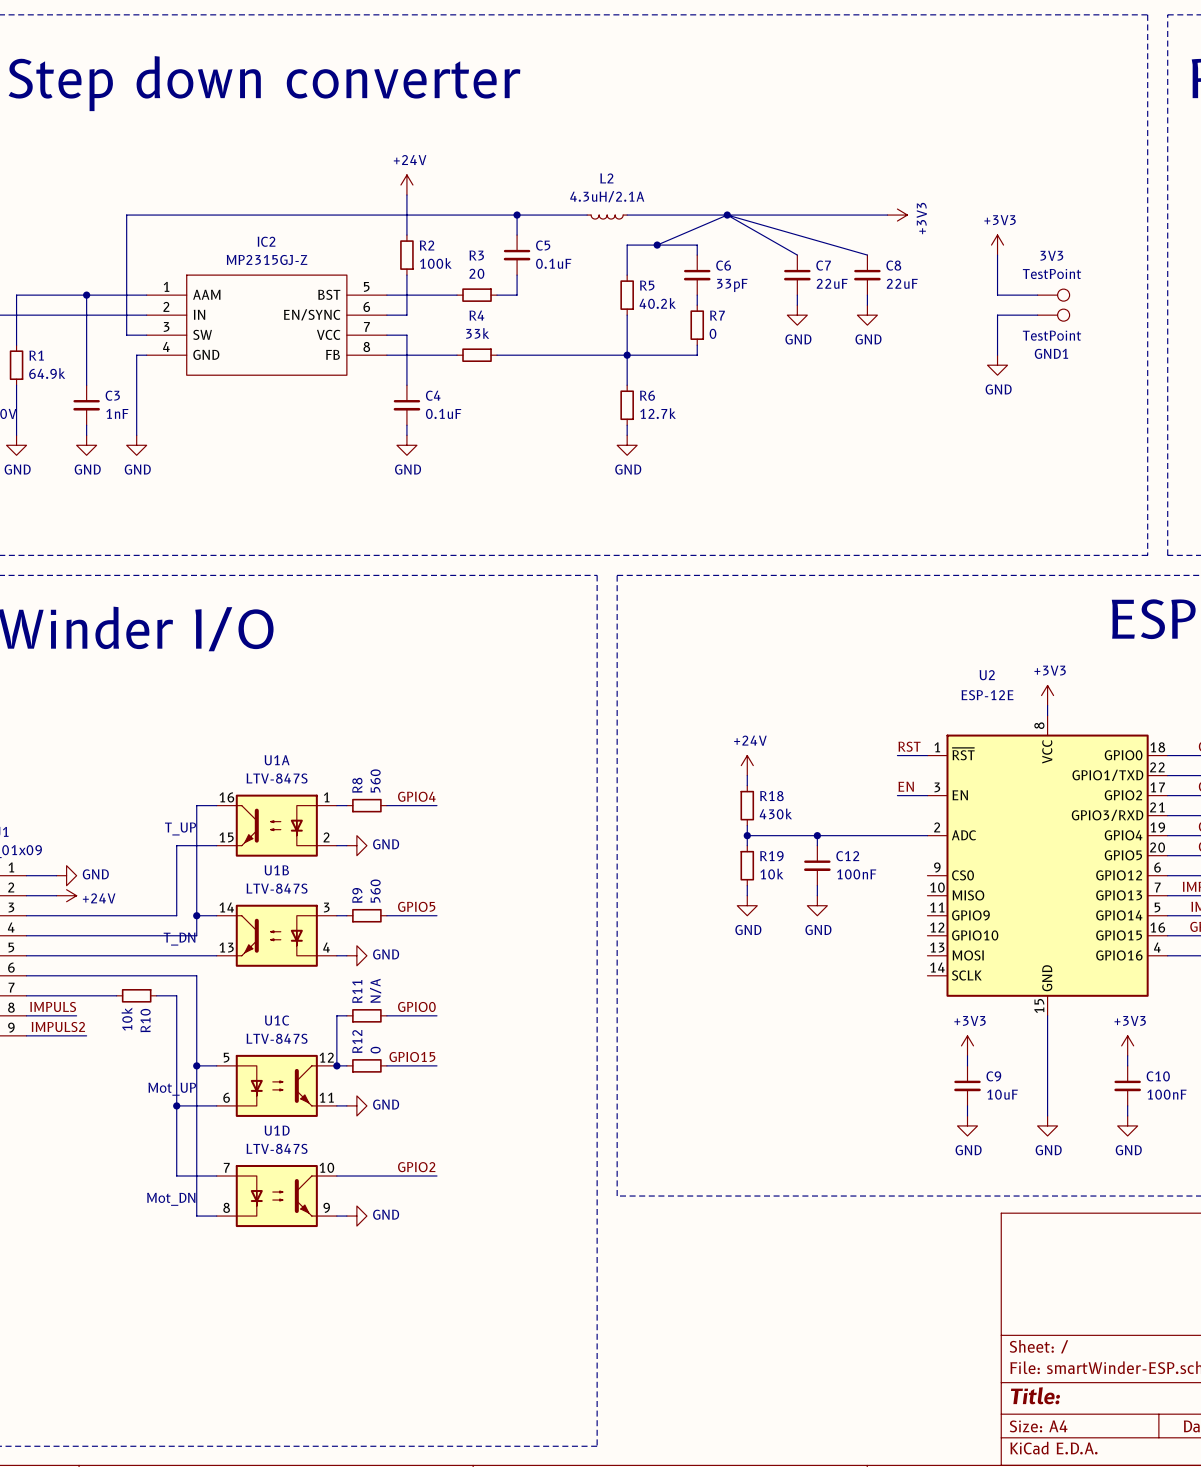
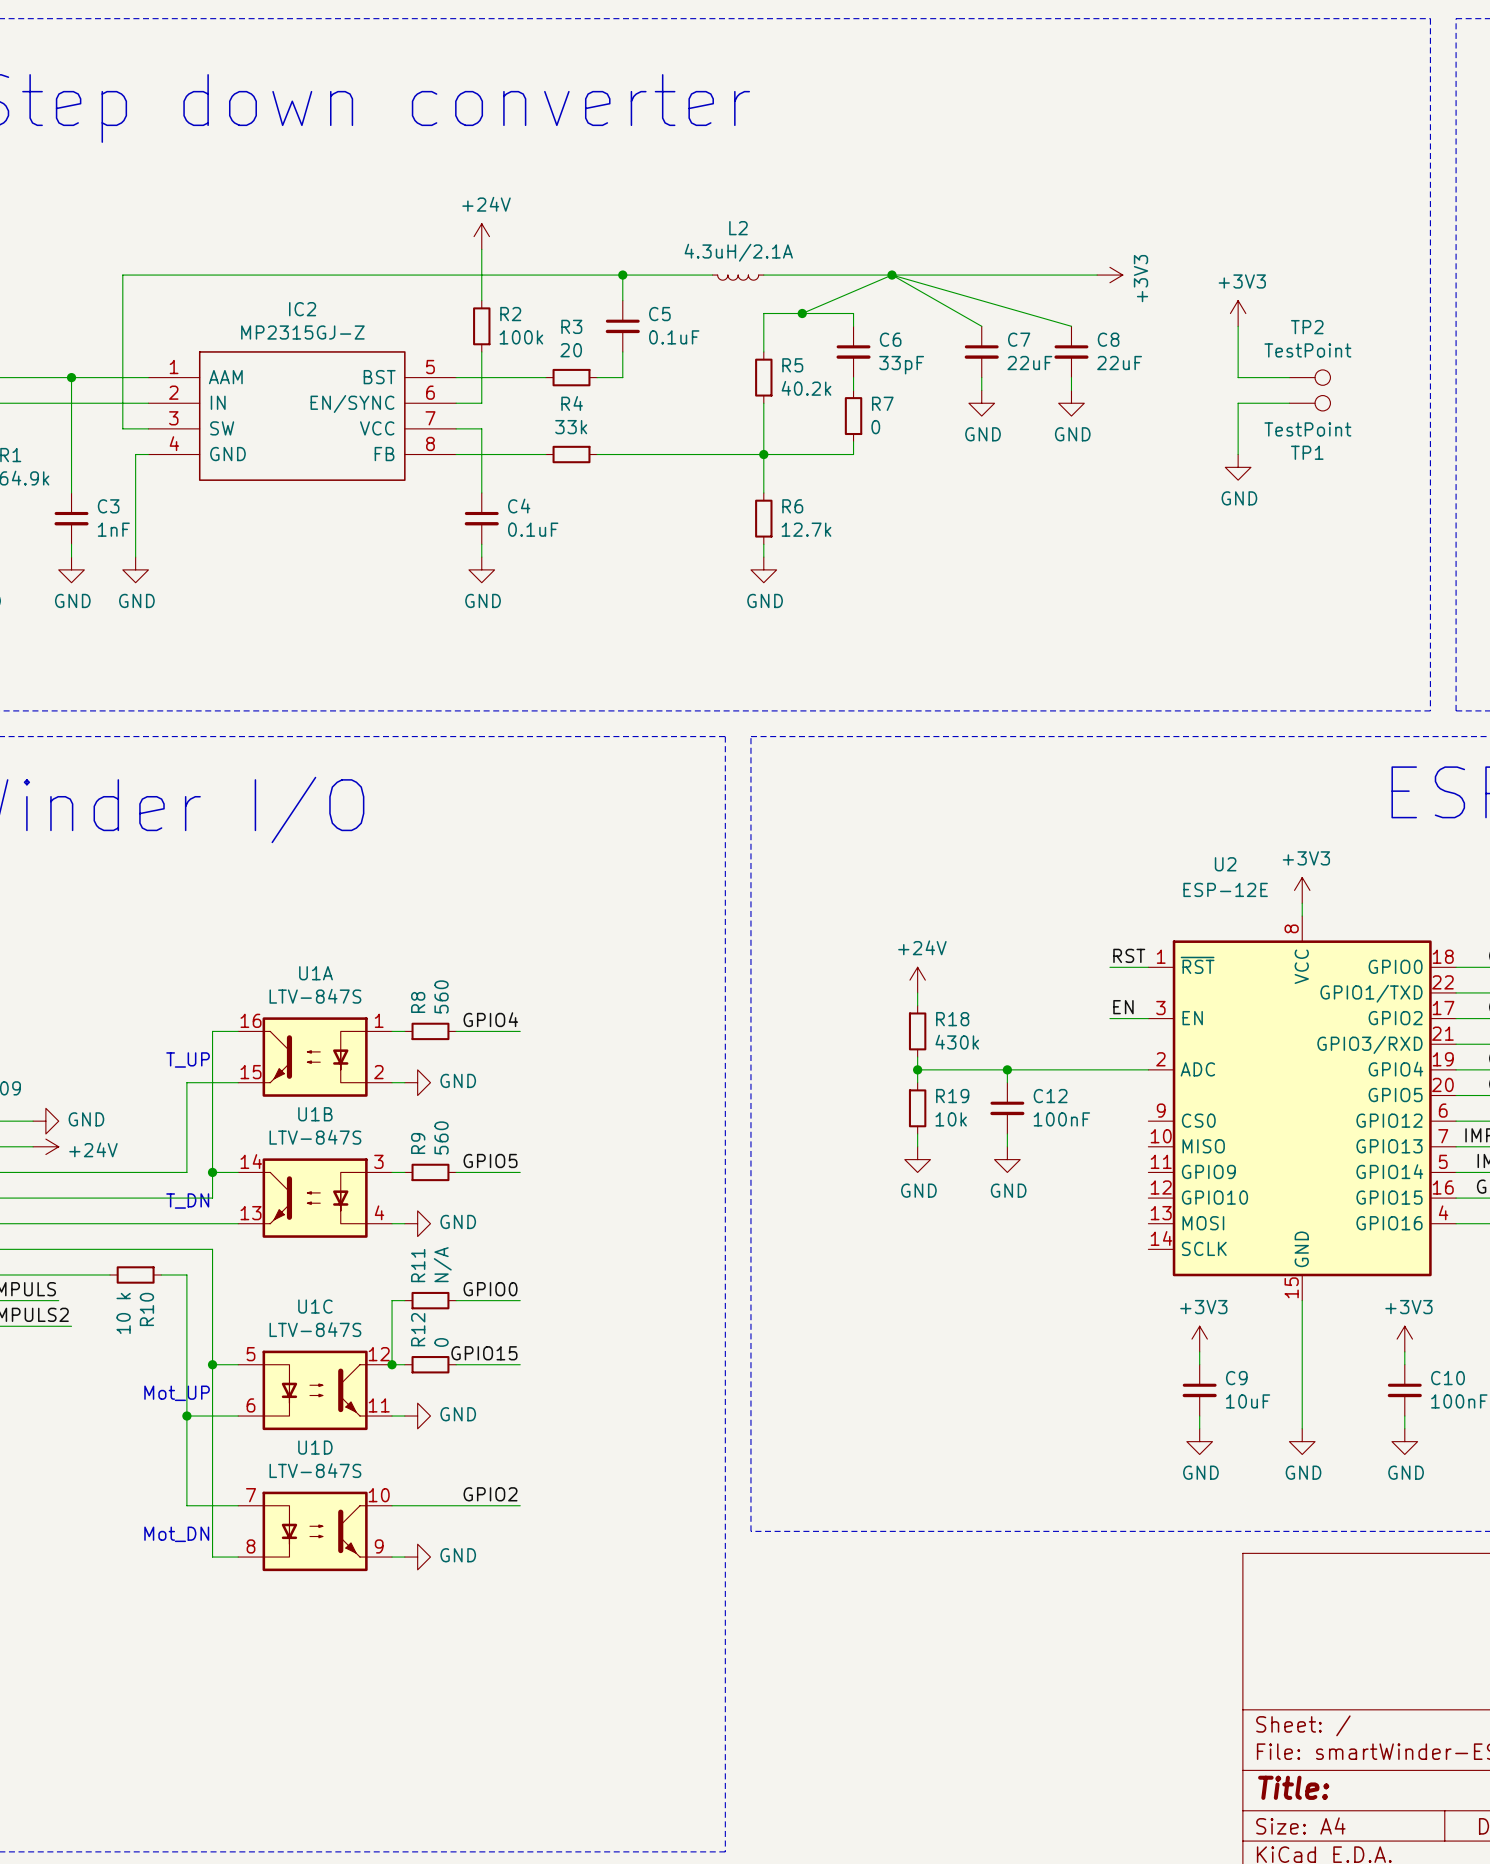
3V3 name: 3V3 (1051, 255) -> TP2 (1307, 327)
GND1 name: GND1 (1051, 353) -> TP1 (1307, 452)
R10 value: 10k (127, 1019) -> 10 k (123, 1313)

